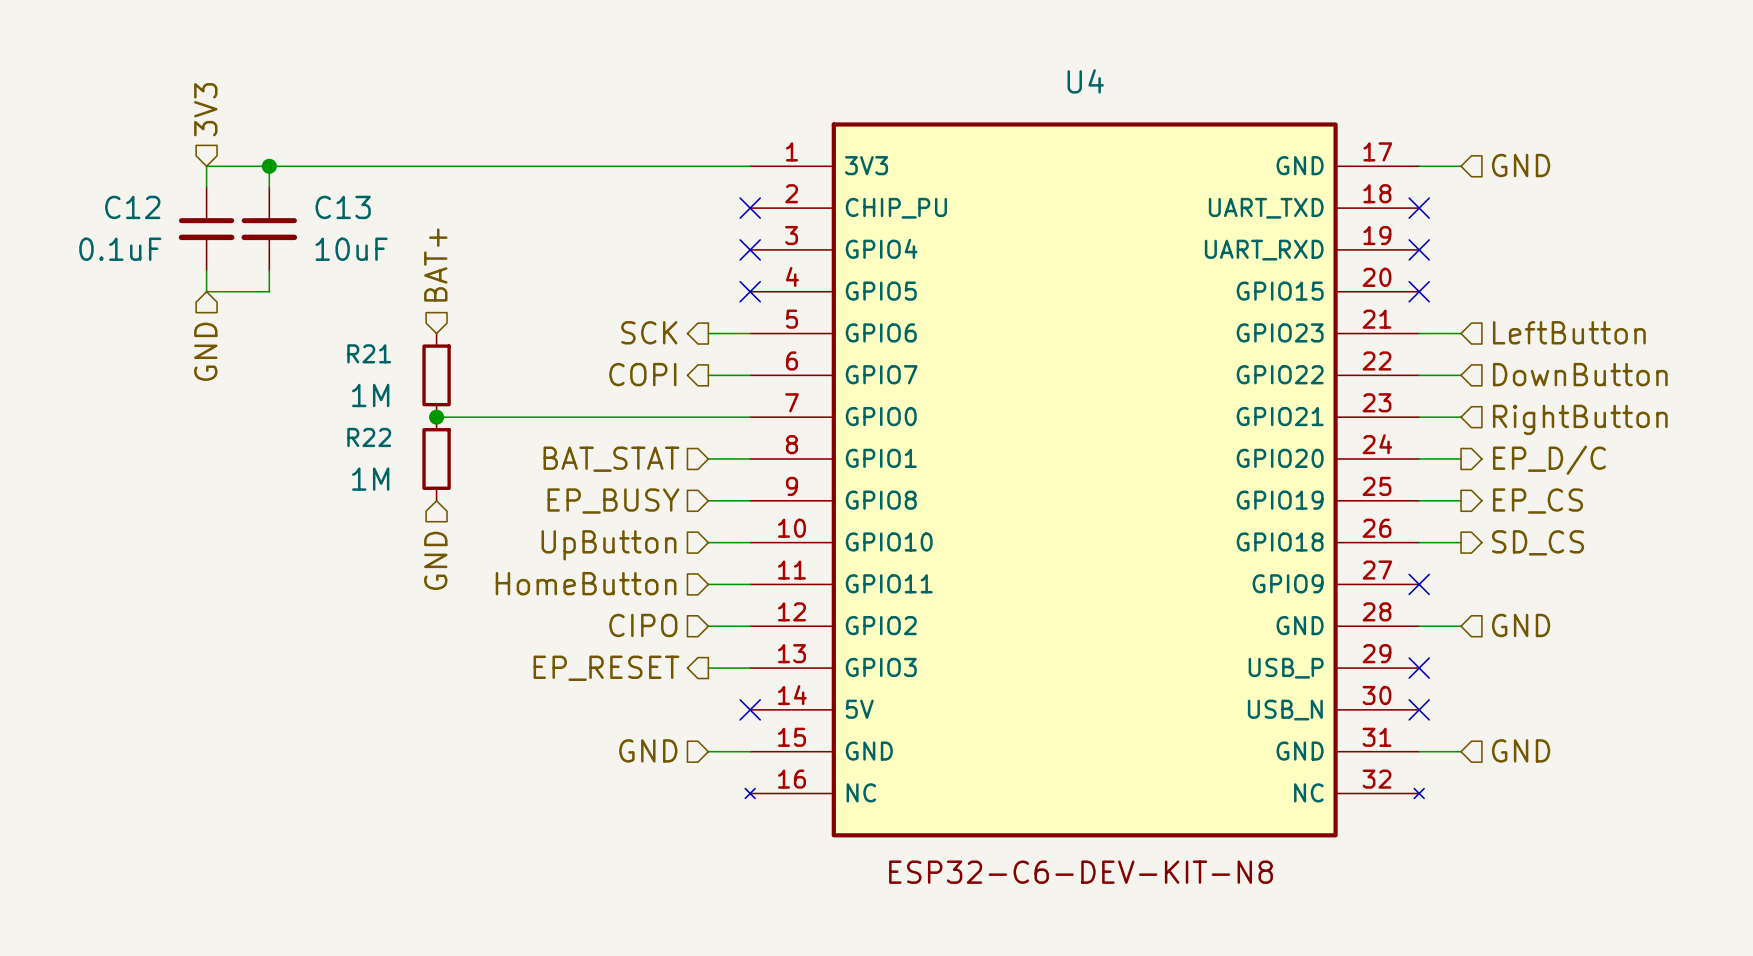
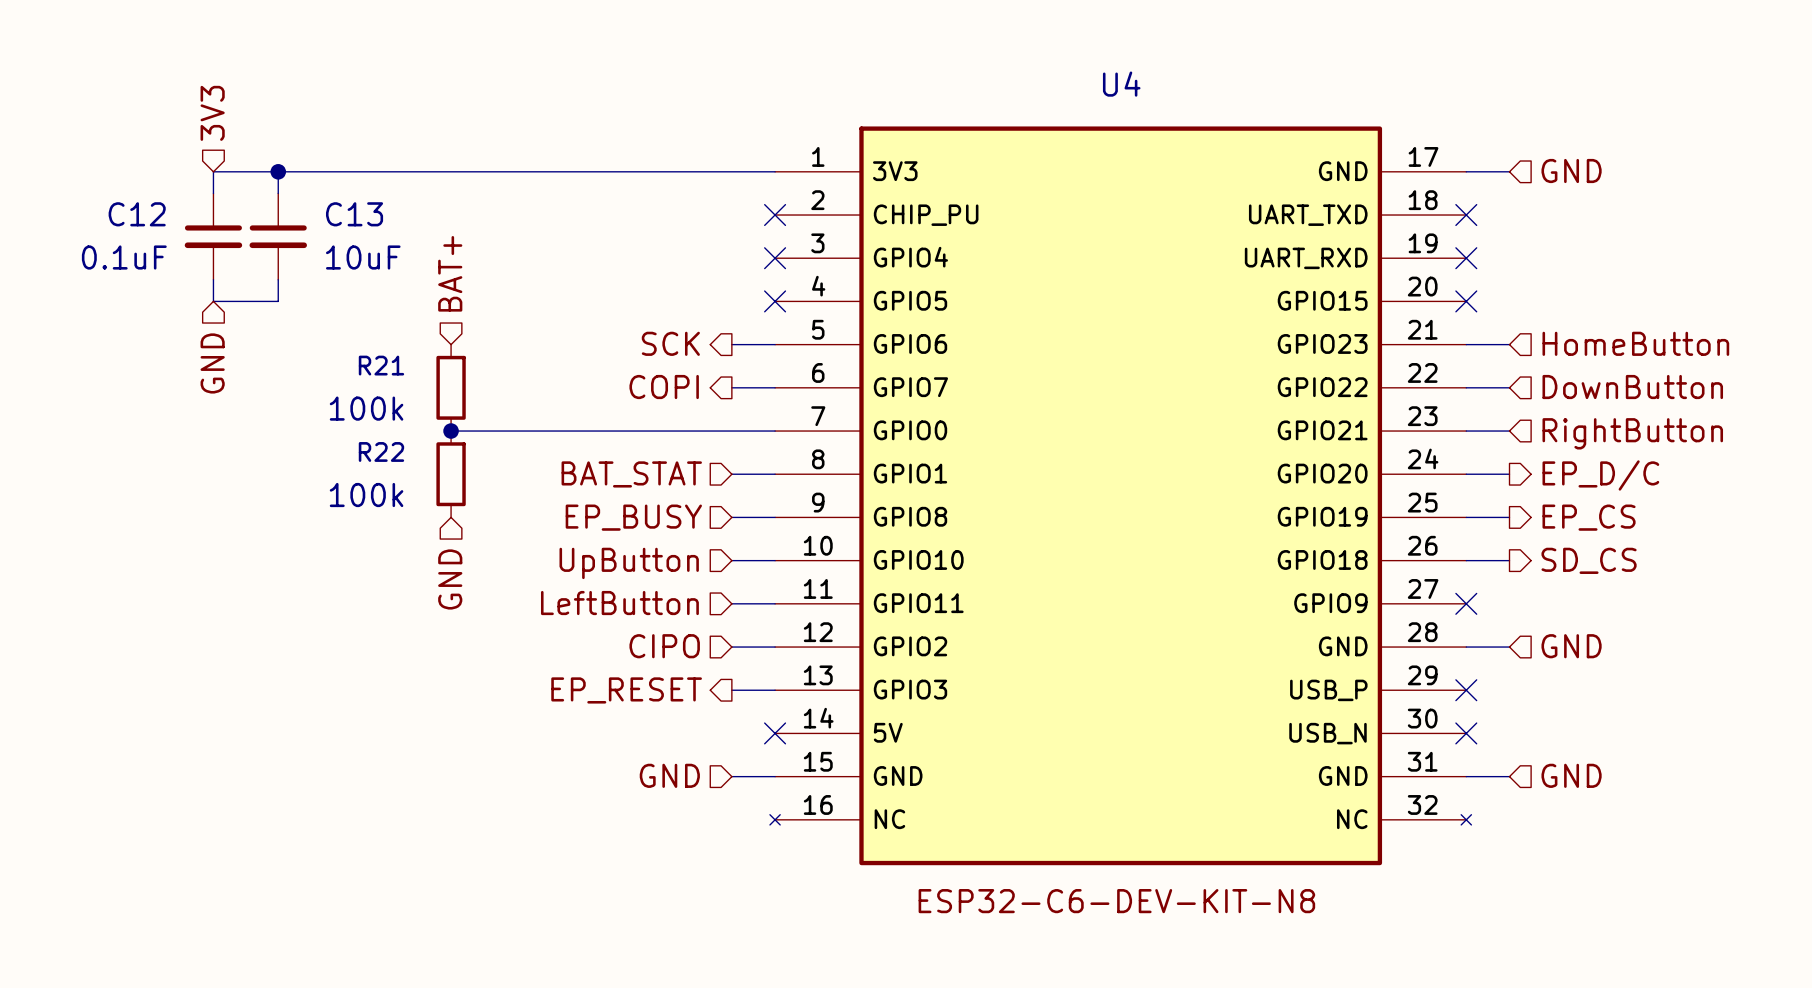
hierarchical label: LeftButton (1569, 332) -> HomeButton (1635, 343)
R21 value: 1M (370, 395) -> 100k (366, 408)
R22 value: 1M (370, 479) -> 100k (366, 495)
hierarchical label: HomeButton (586, 583) -> LeftButton (619, 603)

